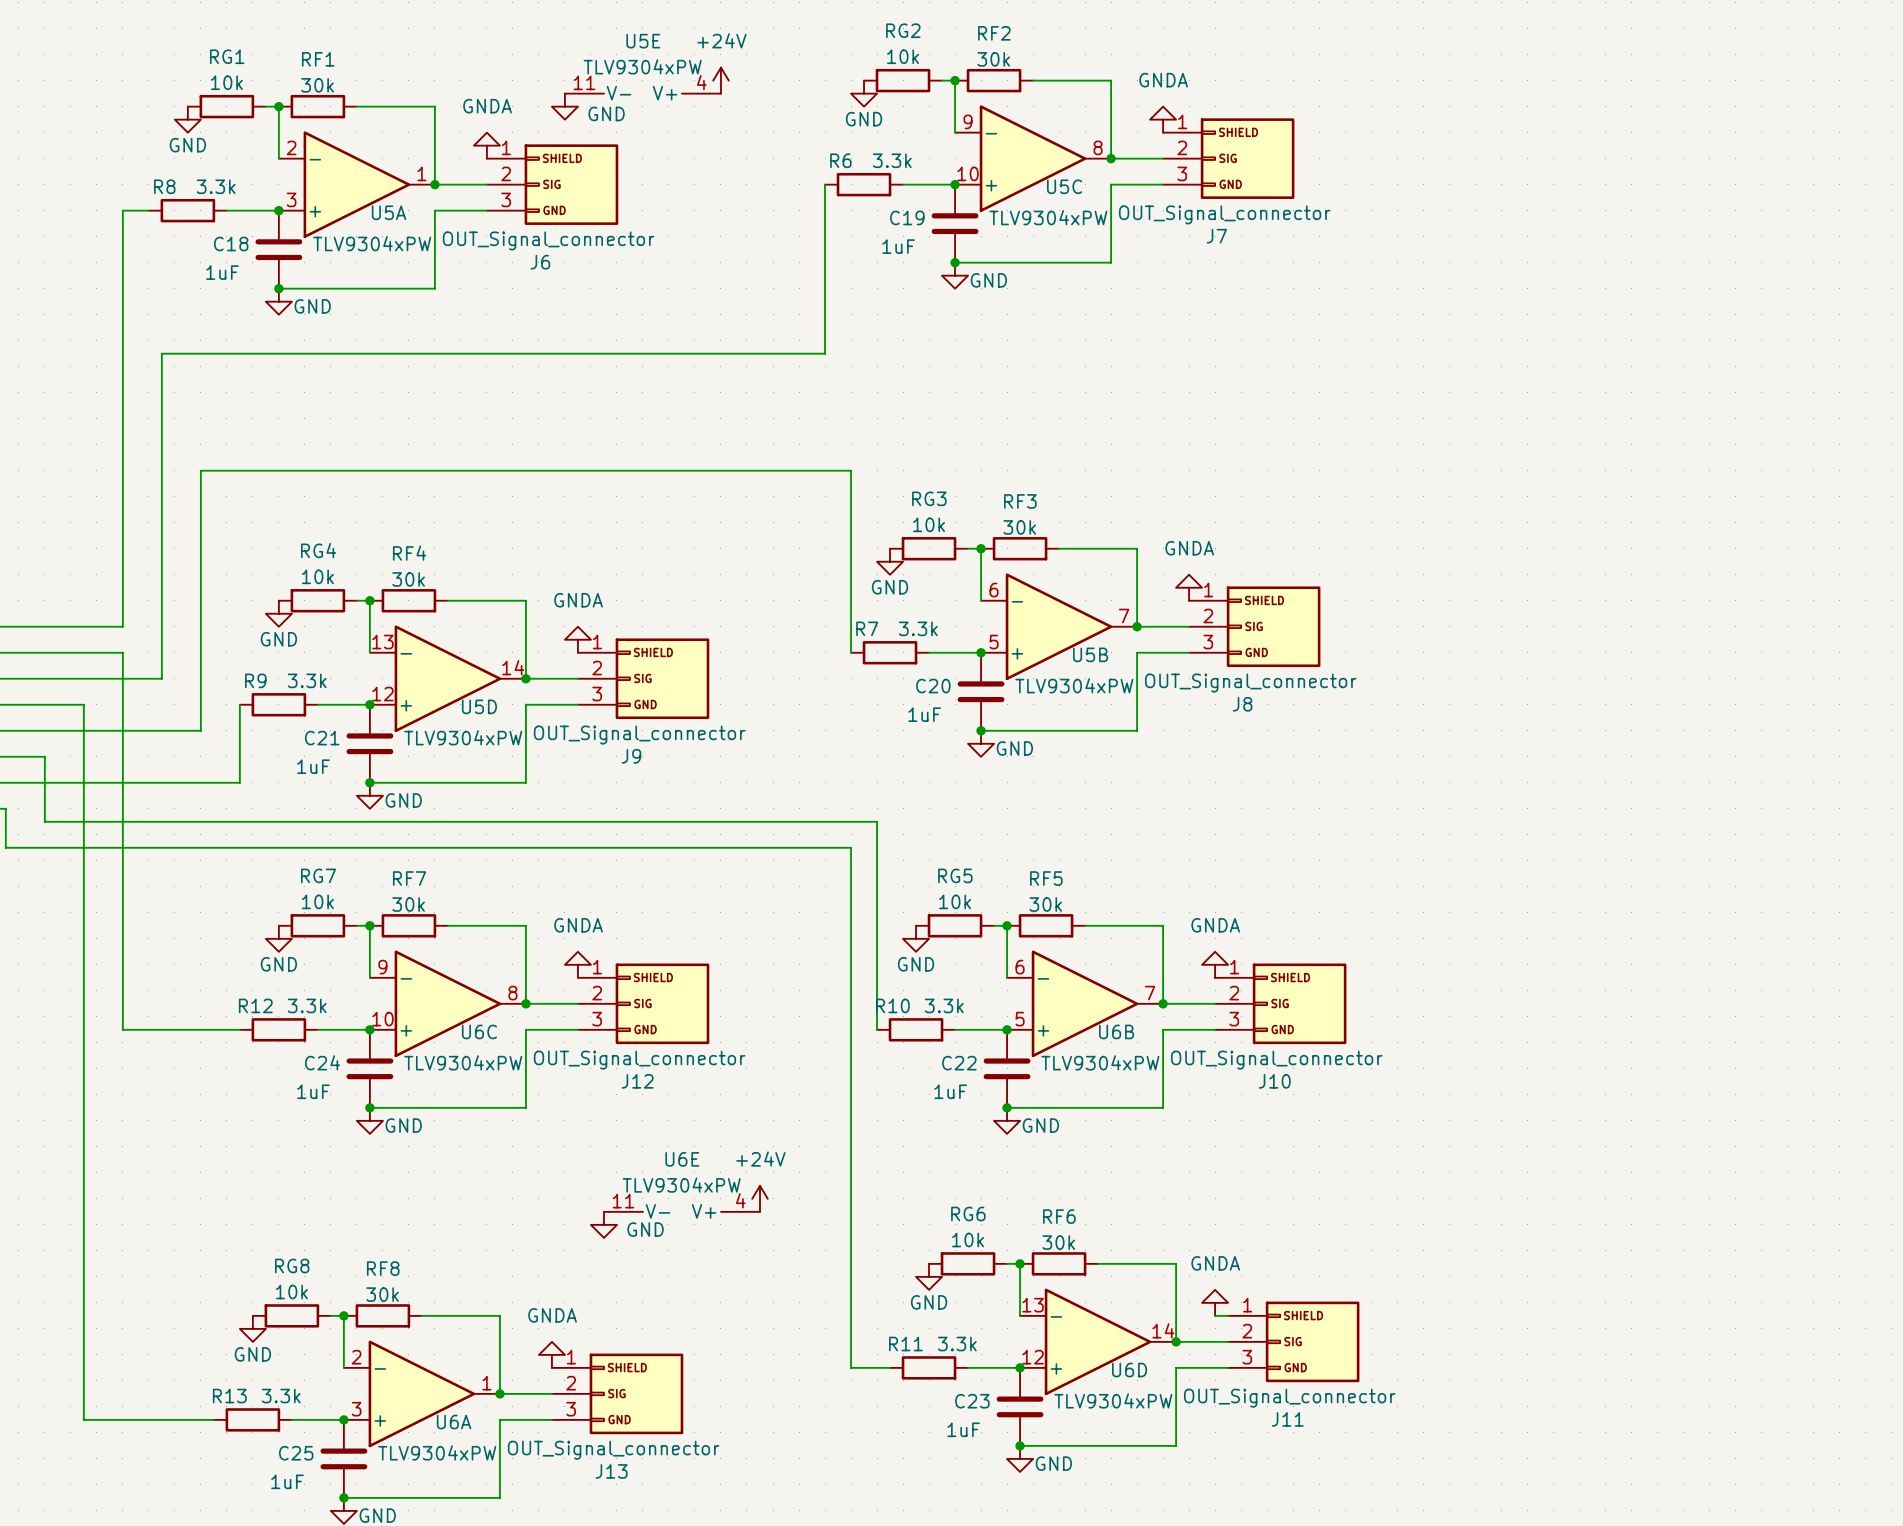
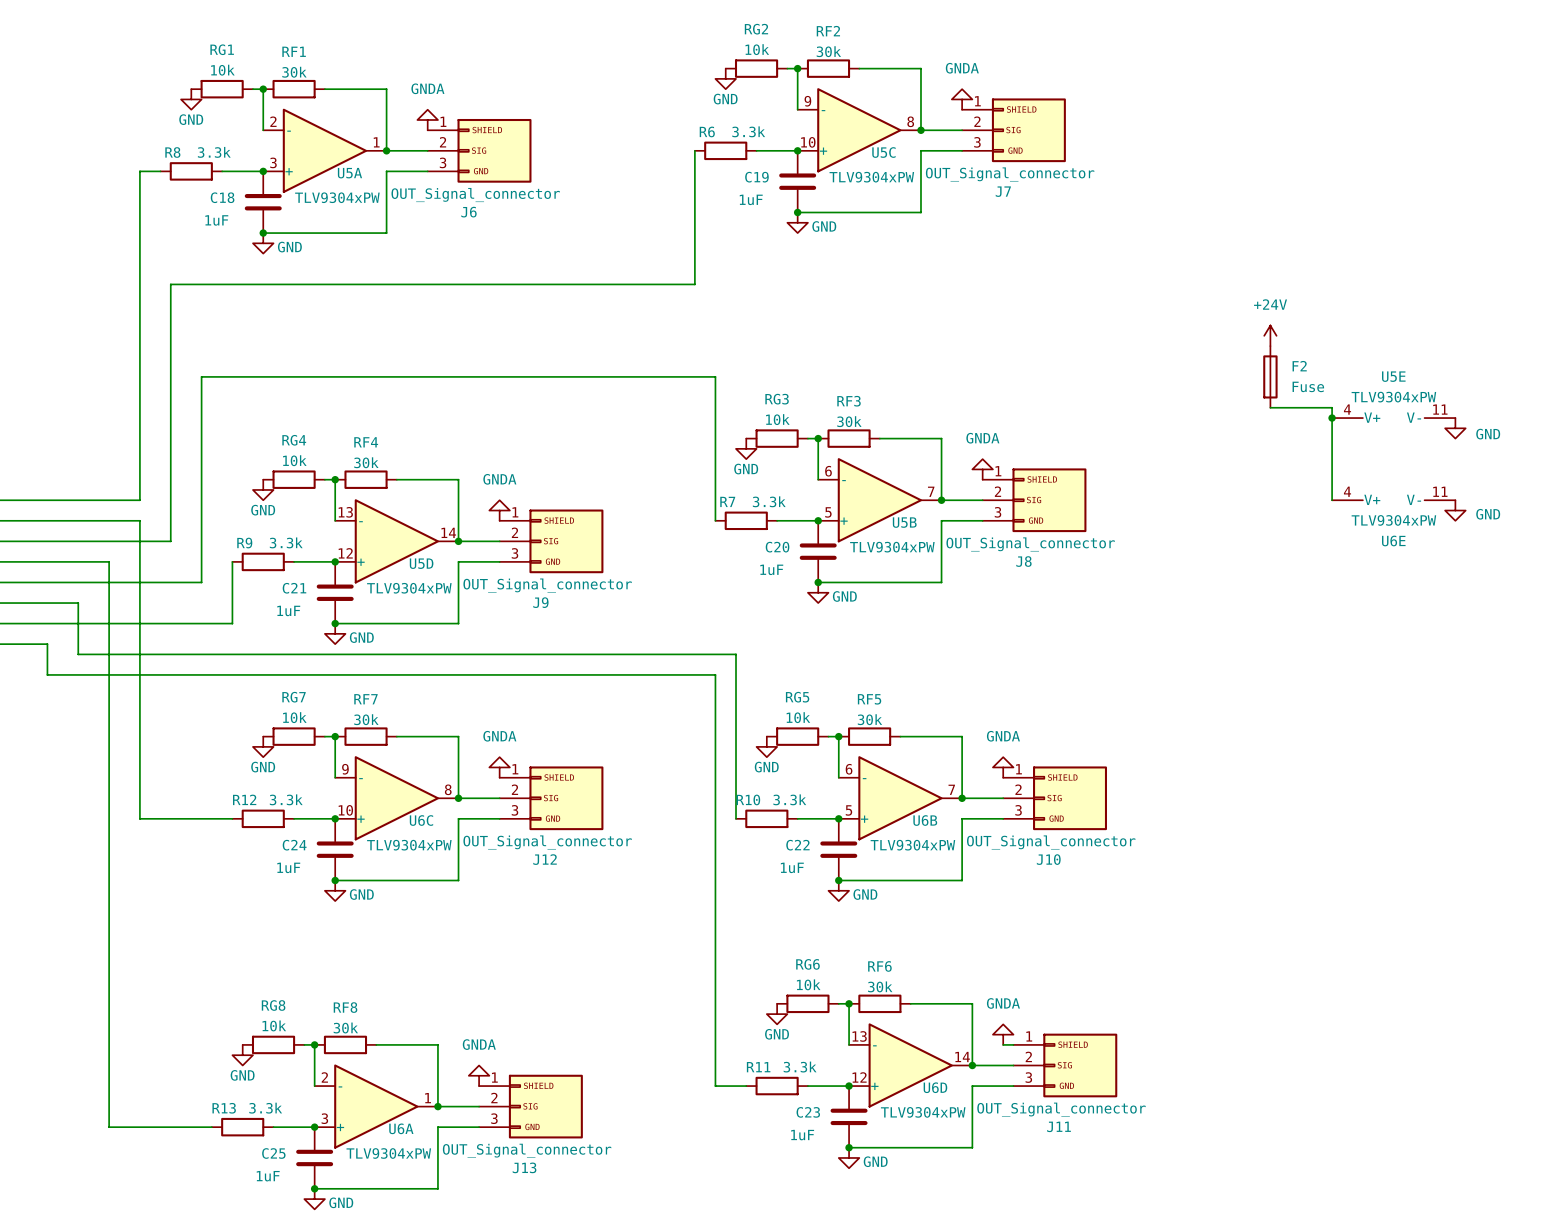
power symbol: +24V (720, 80) -> none
U5E rotation: 0° (642, 93) -> 180° (1393, 418)
U5E position: (642, 93) -> (1393, 418)
power symbol: GND (564, 106) -> none
power symbol: none -> +24V (1270, 335)
F2: none -> Fuse (1270, 376)
wire: none -> (1270, 407) (1332, 407) (1332, 500)
junction: none -> (1332, 418)
power symbol: none -> GND (1455, 428)
power symbol: none -> GND (1455, 510)
power symbol: +24V (760, 1198) -> none
U6E rotation: 0° (681, 1211) -> 180° (1393, 500)
U6E position: (681, 1211) -> (1393, 500)
power symbol: GND (603, 1224) -> none

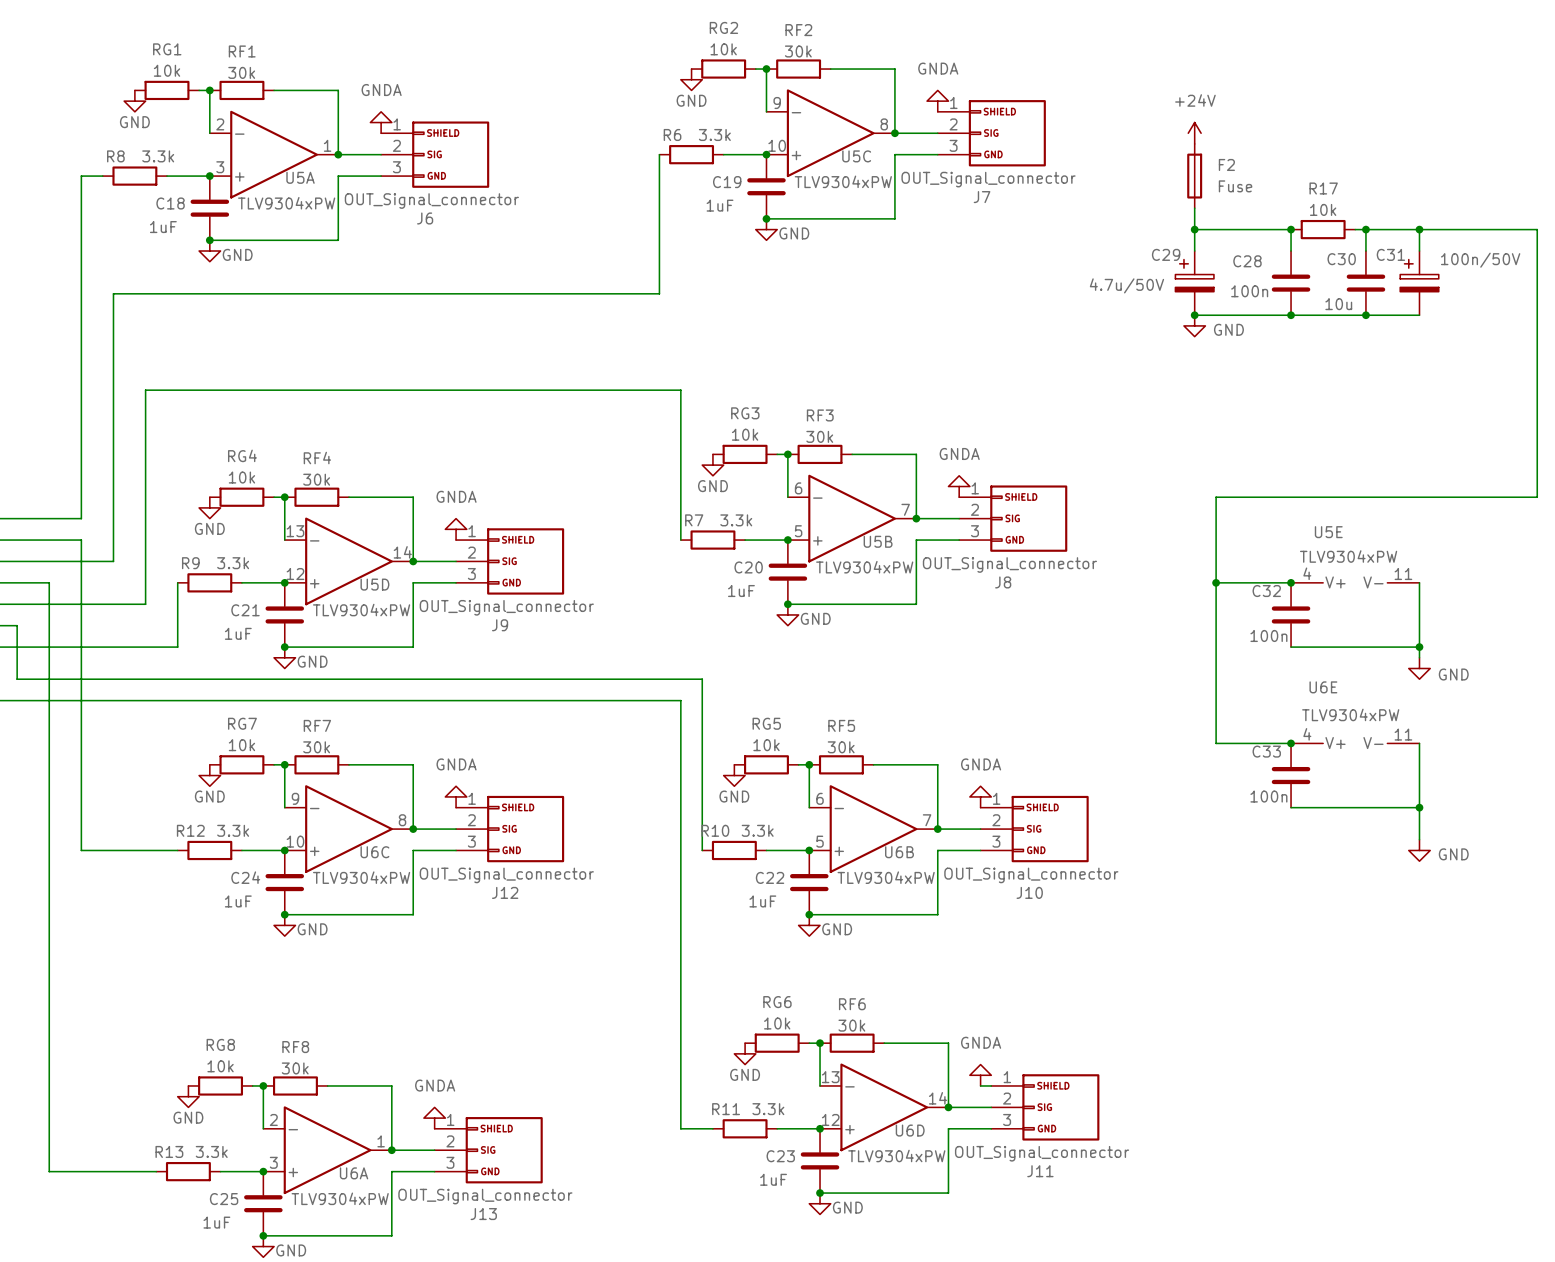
power symbol: none -> +24V (1194, 133)
wire: none -> (1194, 208) (1194, 251)
wire: none -> (1194, 229) (1291, 229) (1291, 251)
junction: none -> (1194, 229)
junction: none -> (1291, 229)
R17: none -> 10k (1323, 229)
wire: none -> (1355, 229) (1537, 229) (1537, 497) (1216, 497) (1216, 743) (1291, 743)
wire: none -> (1365, 229) (1365, 251)
junction: none -> (1365, 229)
wire: none -> (1419, 229) (1419, 251)
junction: none -> (1419, 229)
C29: none -> 4.7u/50V (1194, 283)
C28: none -> 100n (1291, 283)
C30: none -> 10u (1365, 283)
C31: none -> 100n/50V (1419, 283)
wire: none -> (1194, 315) (1419, 315)
junction: none -> (1194, 315)
junction: none -> (1291, 315)
junction: none -> (1365, 315)
power symbol: none -> GND (1194, 325)
power symbol: +24V (1270, 335) -> none
F2 position: (1270, 376) -> (1194, 176)
U5E name position: U5E (1393, 376) -> U5E (1328, 532)
U5E value position: TLV9304xPW (1393, 397) -> TLV9304xPW (1348, 556)
wire: (1270, 407) (1332, 407) (1332, 500) -> none
junction: (1332, 418) -> none
U5E position: (1393, 418) -> (1355, 582)
power symbol: GND (1455, 428) -> none
U6E position: (1393, 500) -> (1355, 743)
power symbol: GND (1455, 510) -> none
U6E value position: TLV9304xPW (1393, 520) -> TLV9304xPW (1350, 714)
U6E name position: U6E (1393, 540) -> U6E (1323, 687)
wire: none -> (1216, 582) (1291, 582)
junction: none -> (1216, 582)
junction: none -> (1291, 582)
wire: none -> (1419, 582) (1419, 657)
C32: none -> 100n (1291, 614)
wire: none -> (1291, 647) (1419, 647)
junction: none -> (1419, 647)
power symbol: none -> GND (1419, 668)
junction: none -> (1291, 743)
wire: none -> (1419, 743) (1419, 839)
C33: none -> 100n (1291, 775)
wire: none -> (1291, 807) (1419, 807)
junction: none -> (1419, 807)
power symbol: none -> GND (1419, 850)

